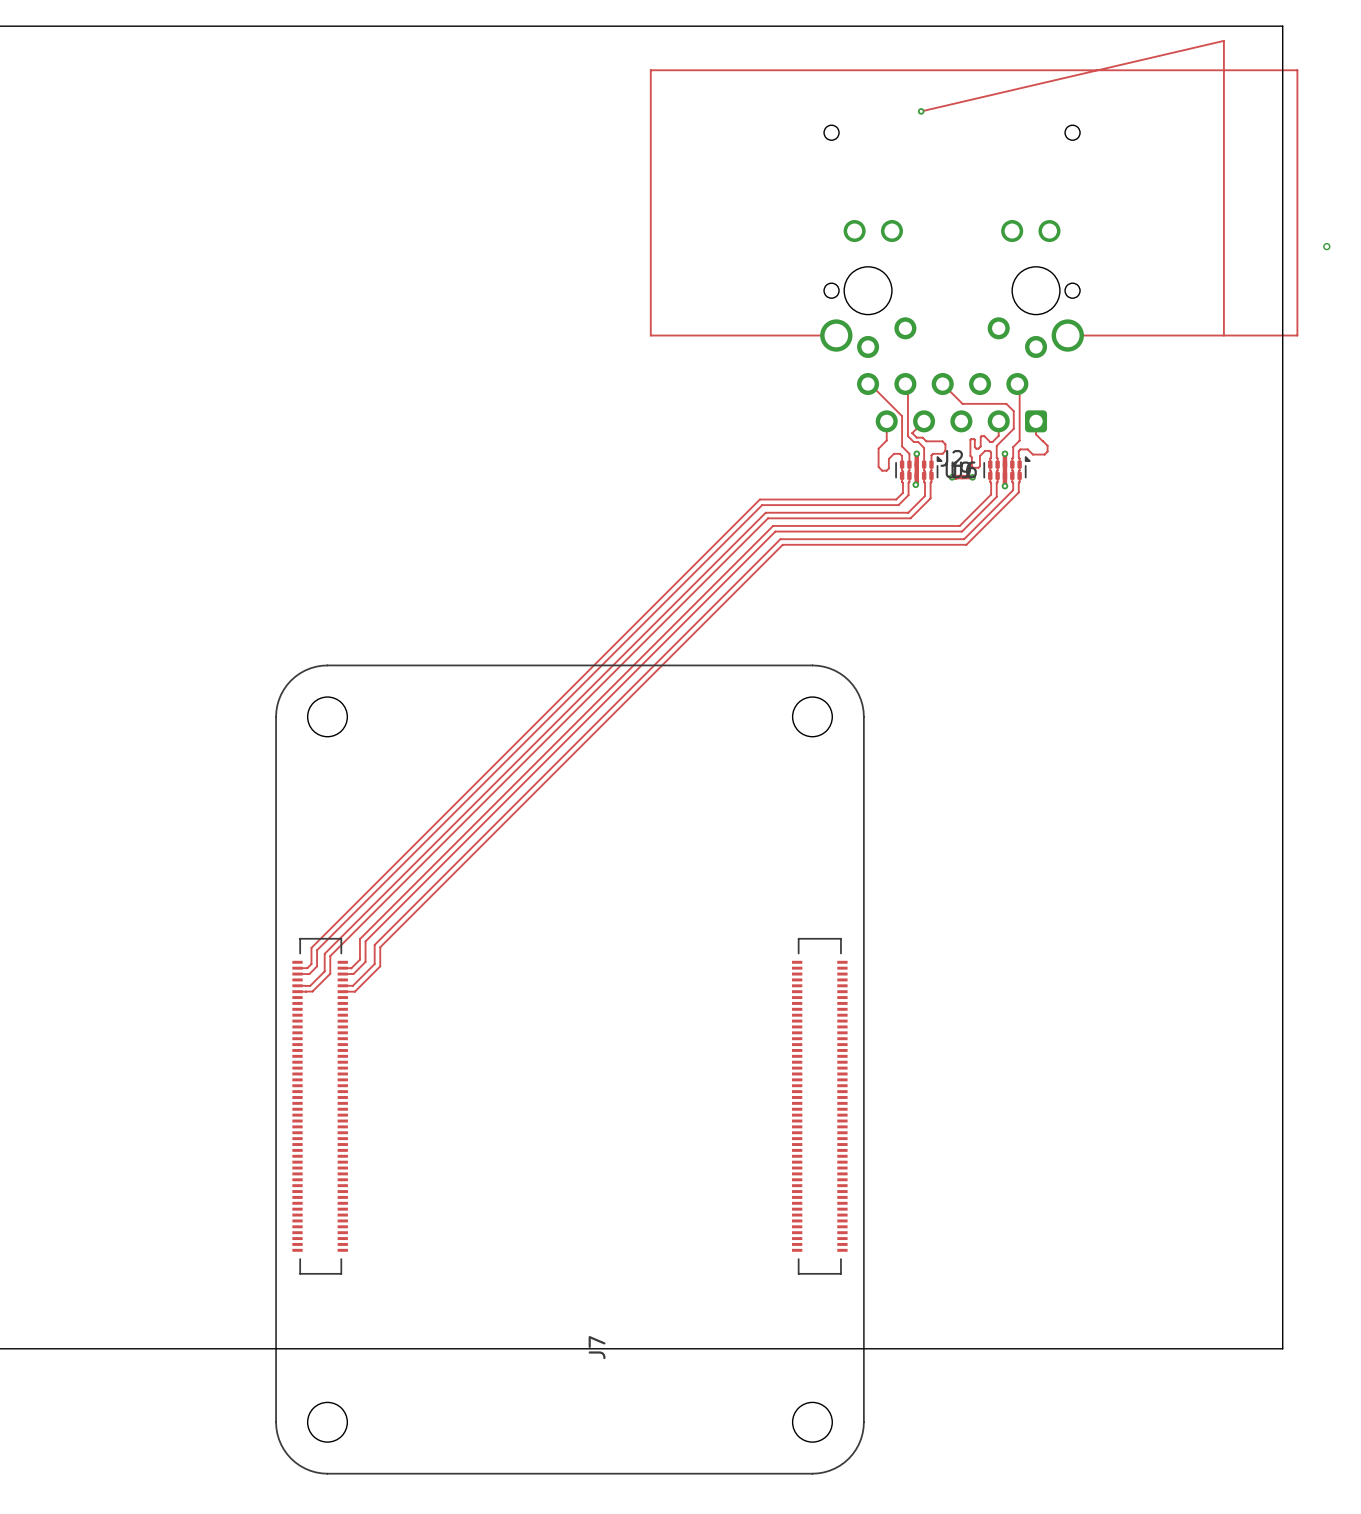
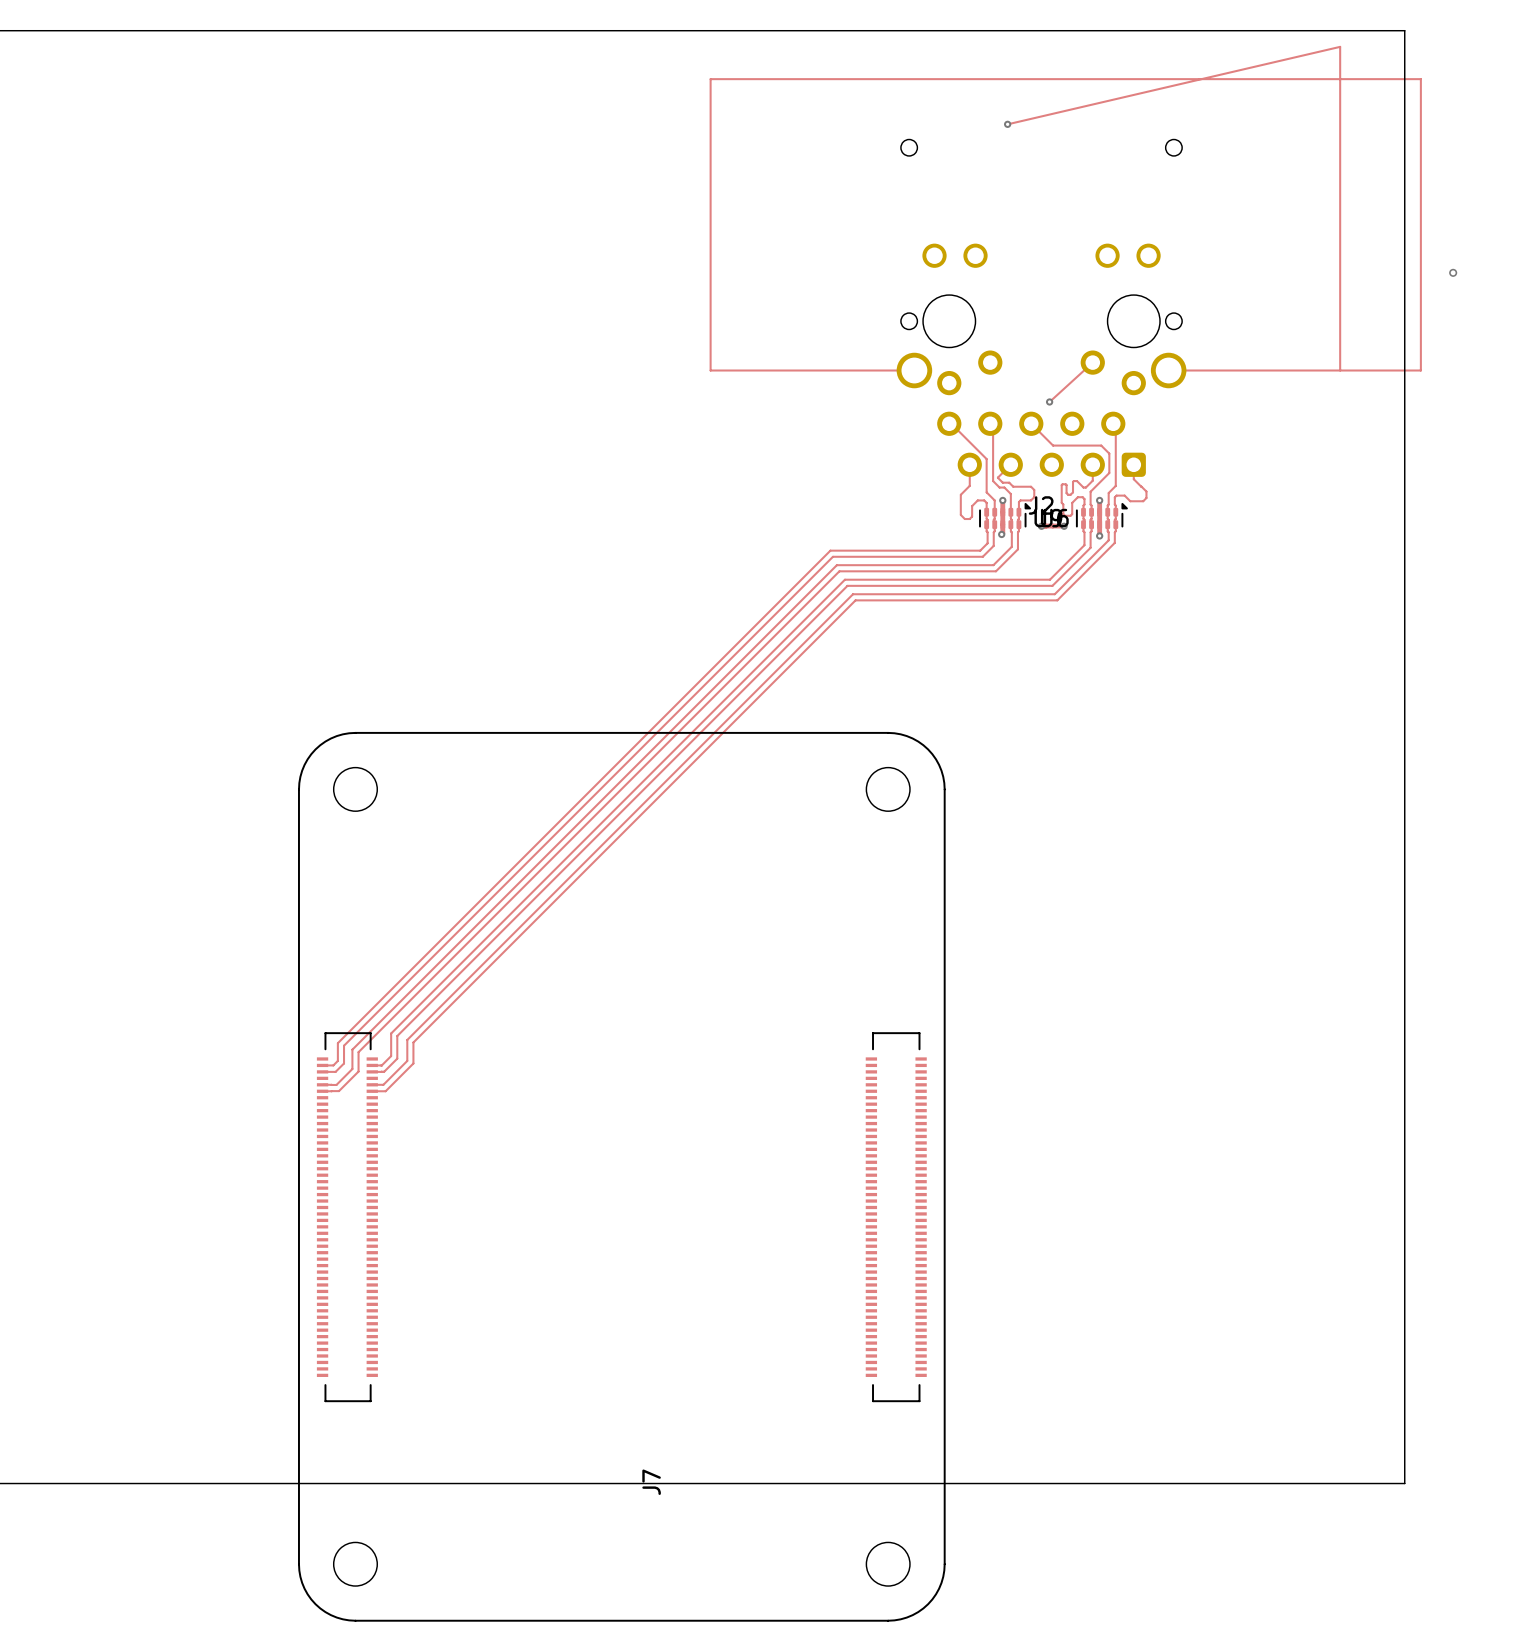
track: none -> (1092, 362) (1049, 401)
via: none -> (1049, 401)

